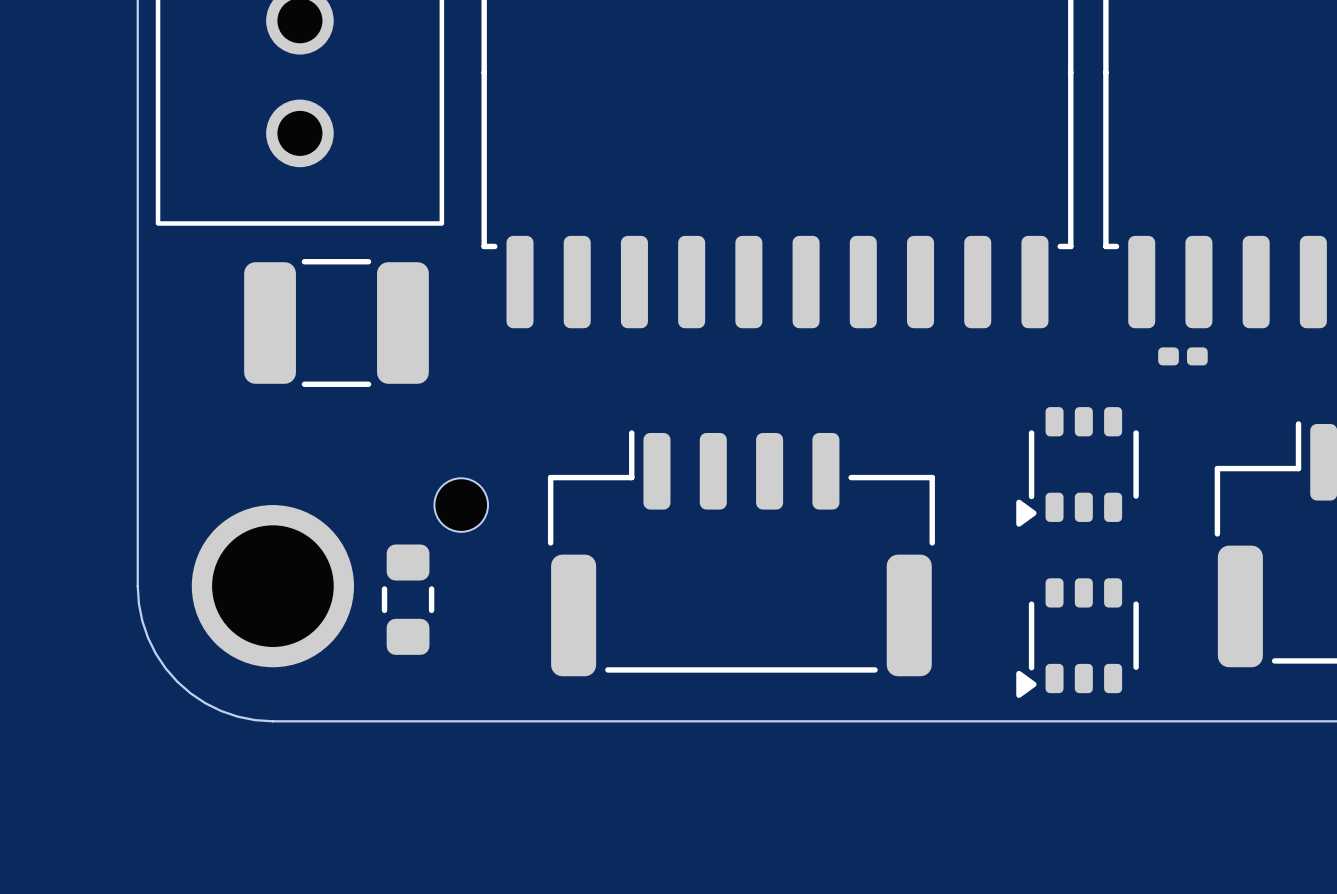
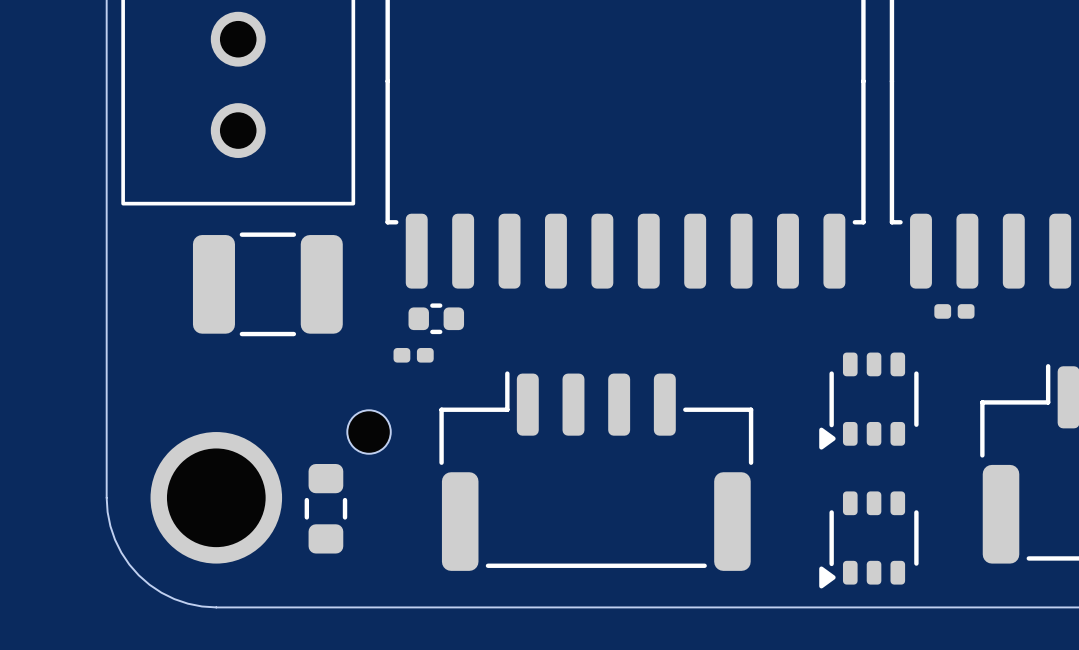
part: none -> (436, 318)
part: none -> (413, 355)

